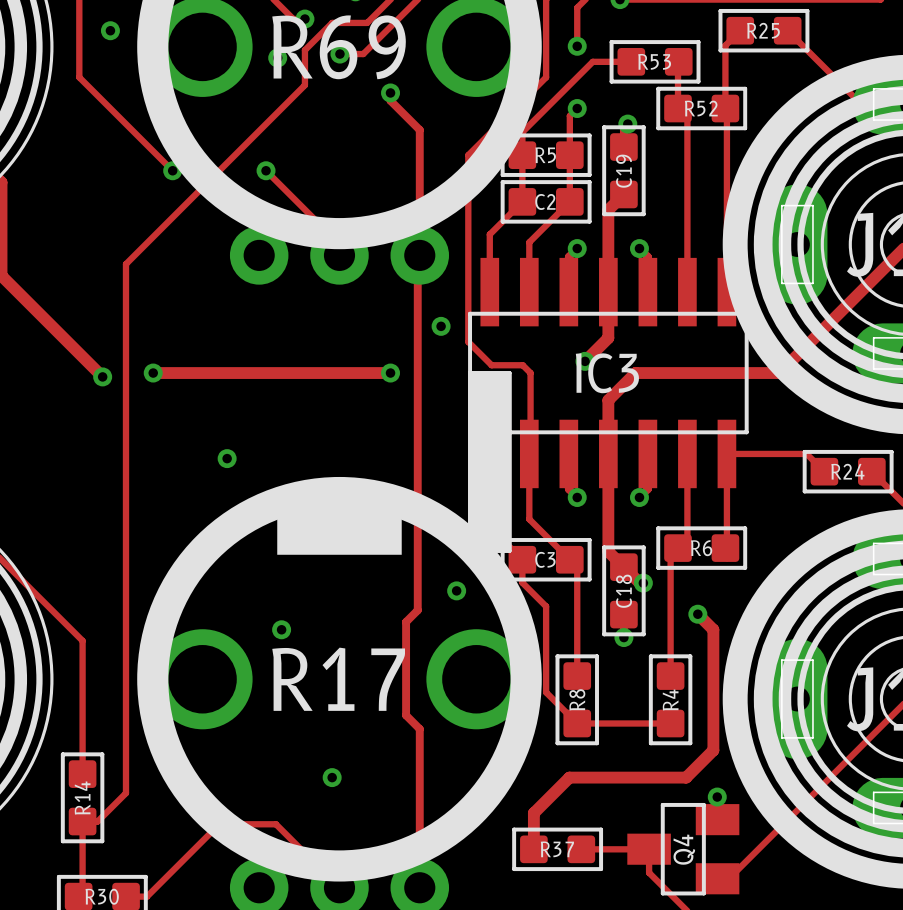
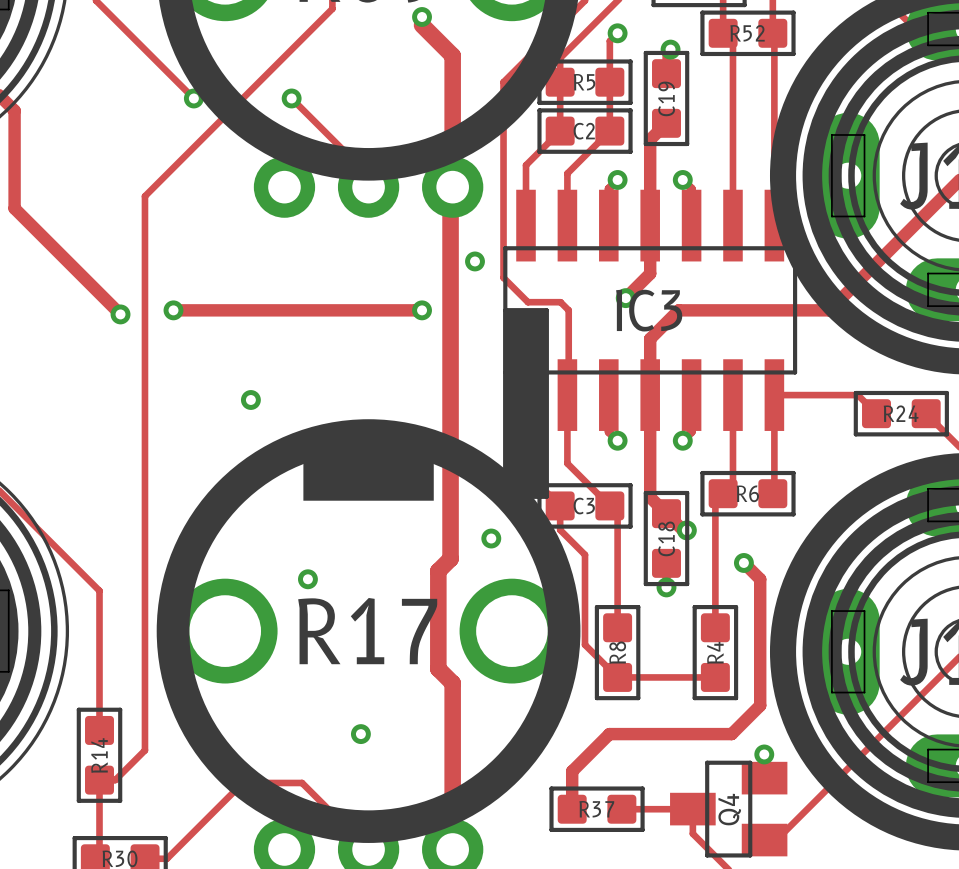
track width: thin (390, 100) (419, 129) (419, 255) -> thick (422, 25) (452, 55) (452, 187)
track width: thin (417, 257) (417, 610) (406, 621) (406, 715) (419, 729) (419, 887) -> thick (450, 189) (450, 558) (438, 571) (438, 668) (452, 683) (452, 849)

